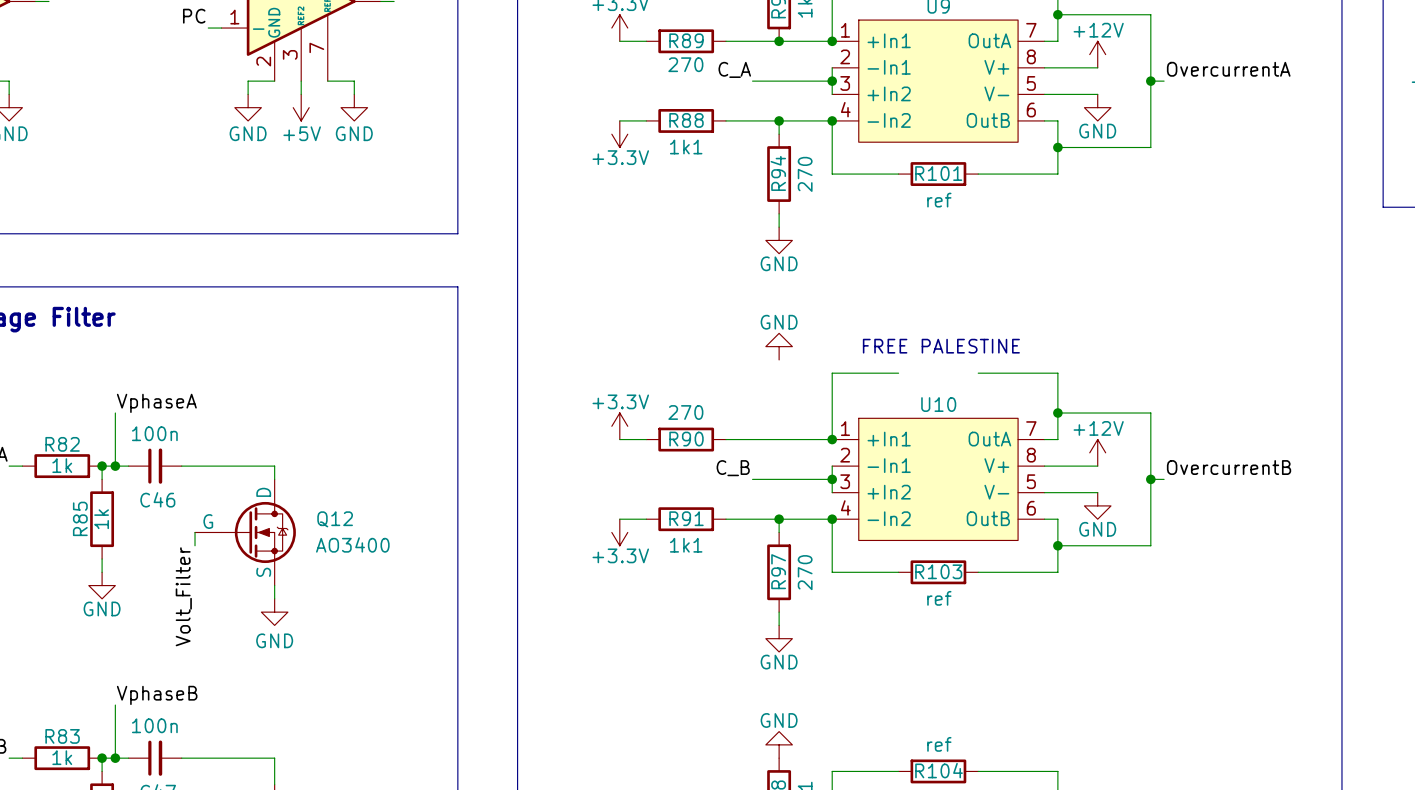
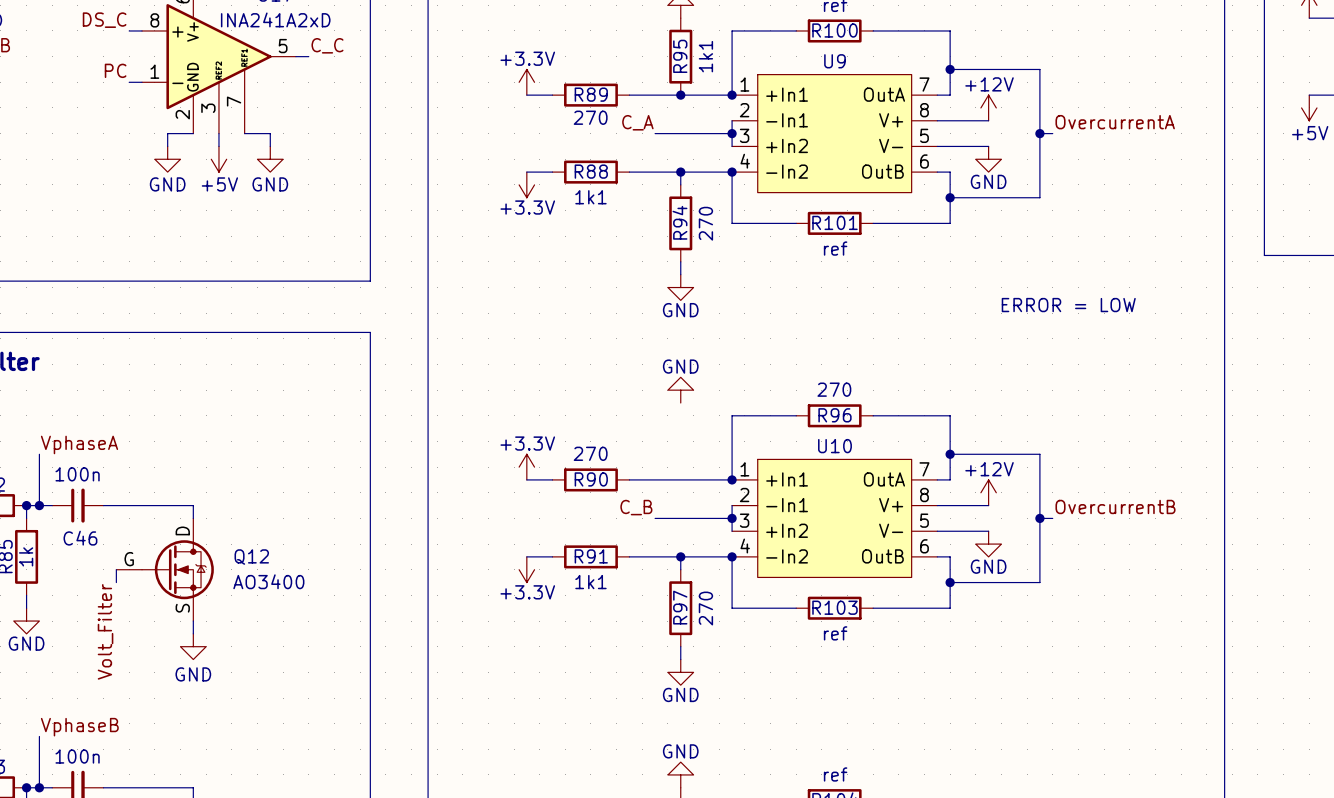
text: none -> ERROR = LOW (1068, 305)
text: FREE PALESTINE (941, 346) -> none
R96: none -> 270 (834, 415)

